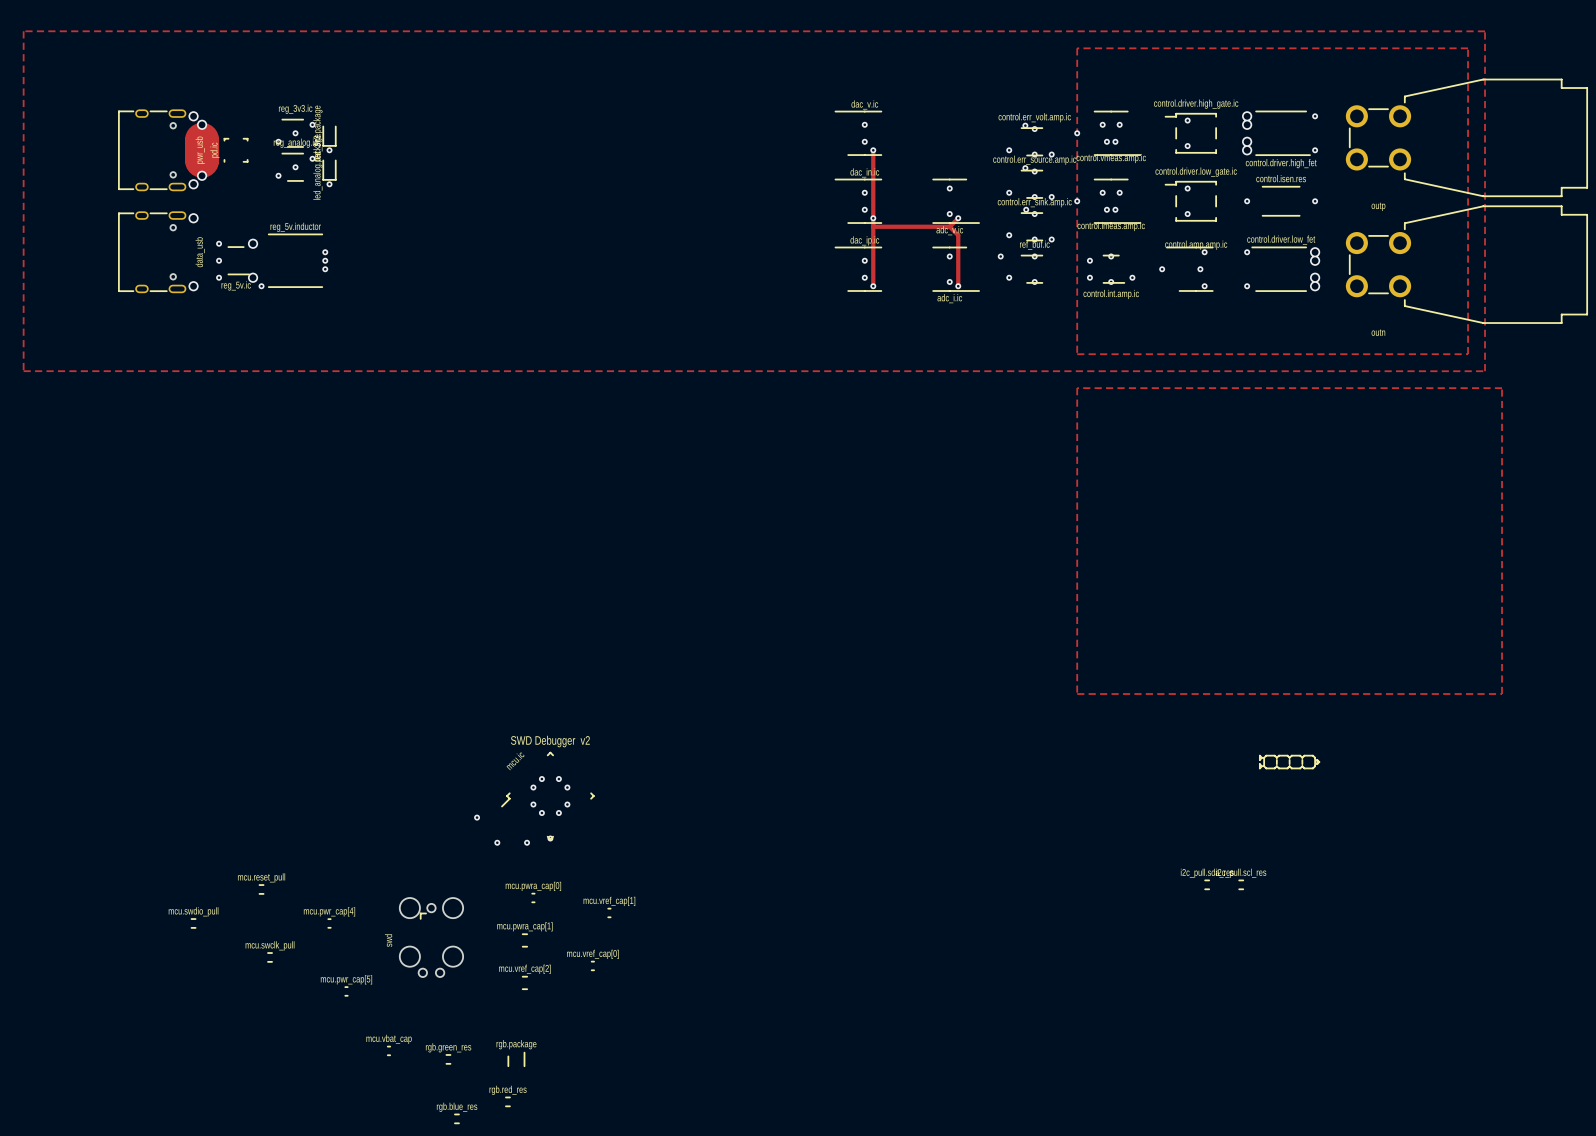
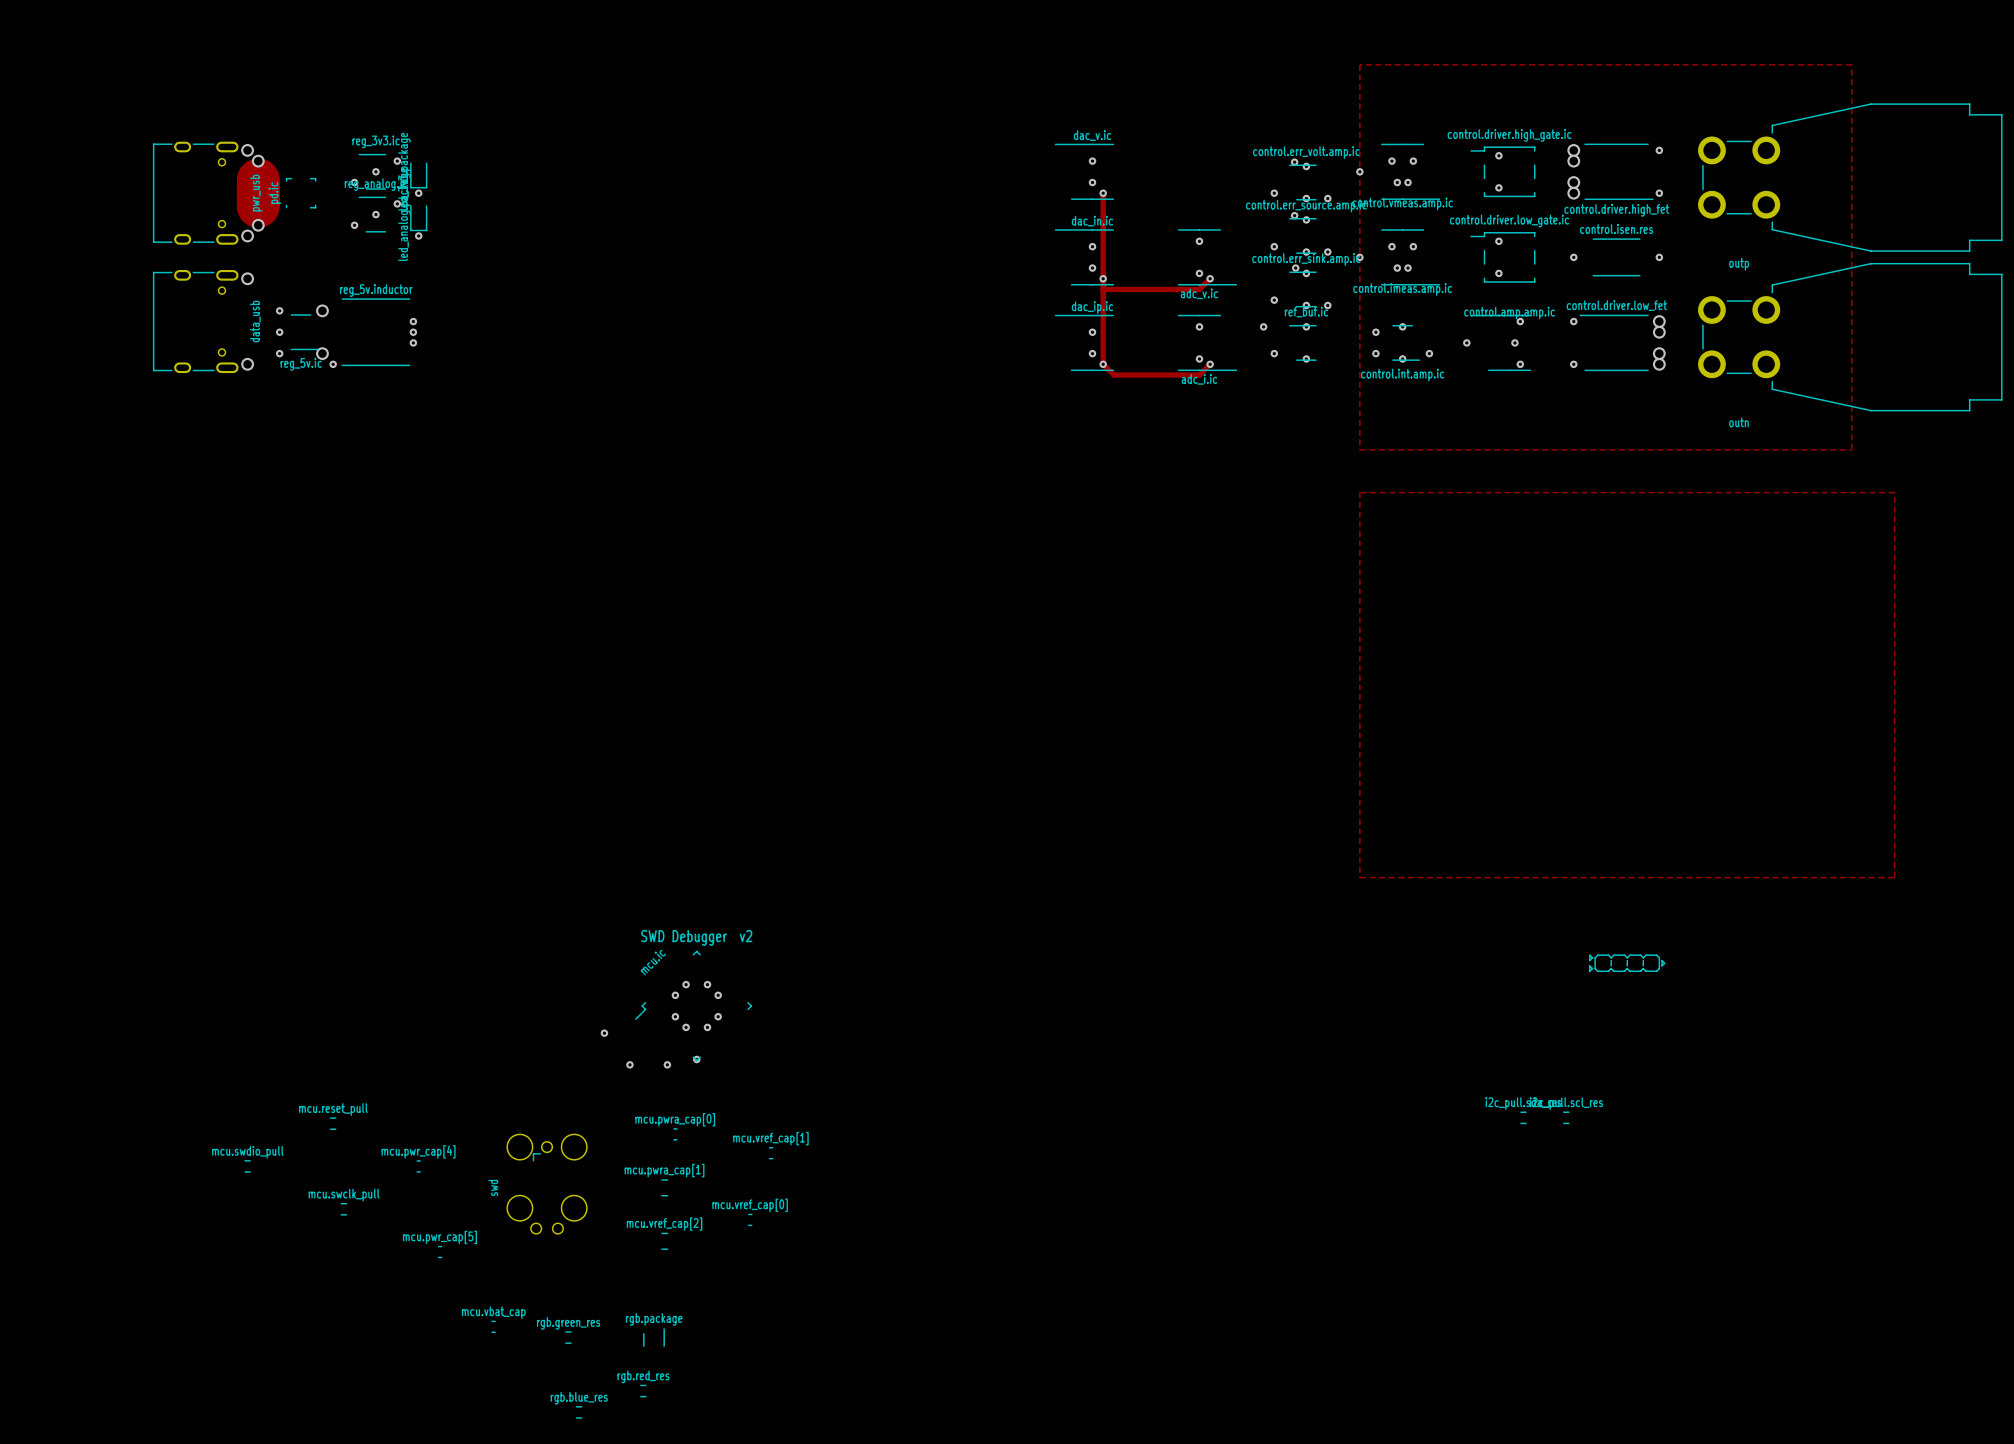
zone outline: (23, 31) (23, 371) (1485, 371) (1485, 31) (23, 31) -> none
track: (949, 226) (958, 235) (958, 286) -> (1103, 364) (1113, 375) (1199, 375) (1210, 364)

